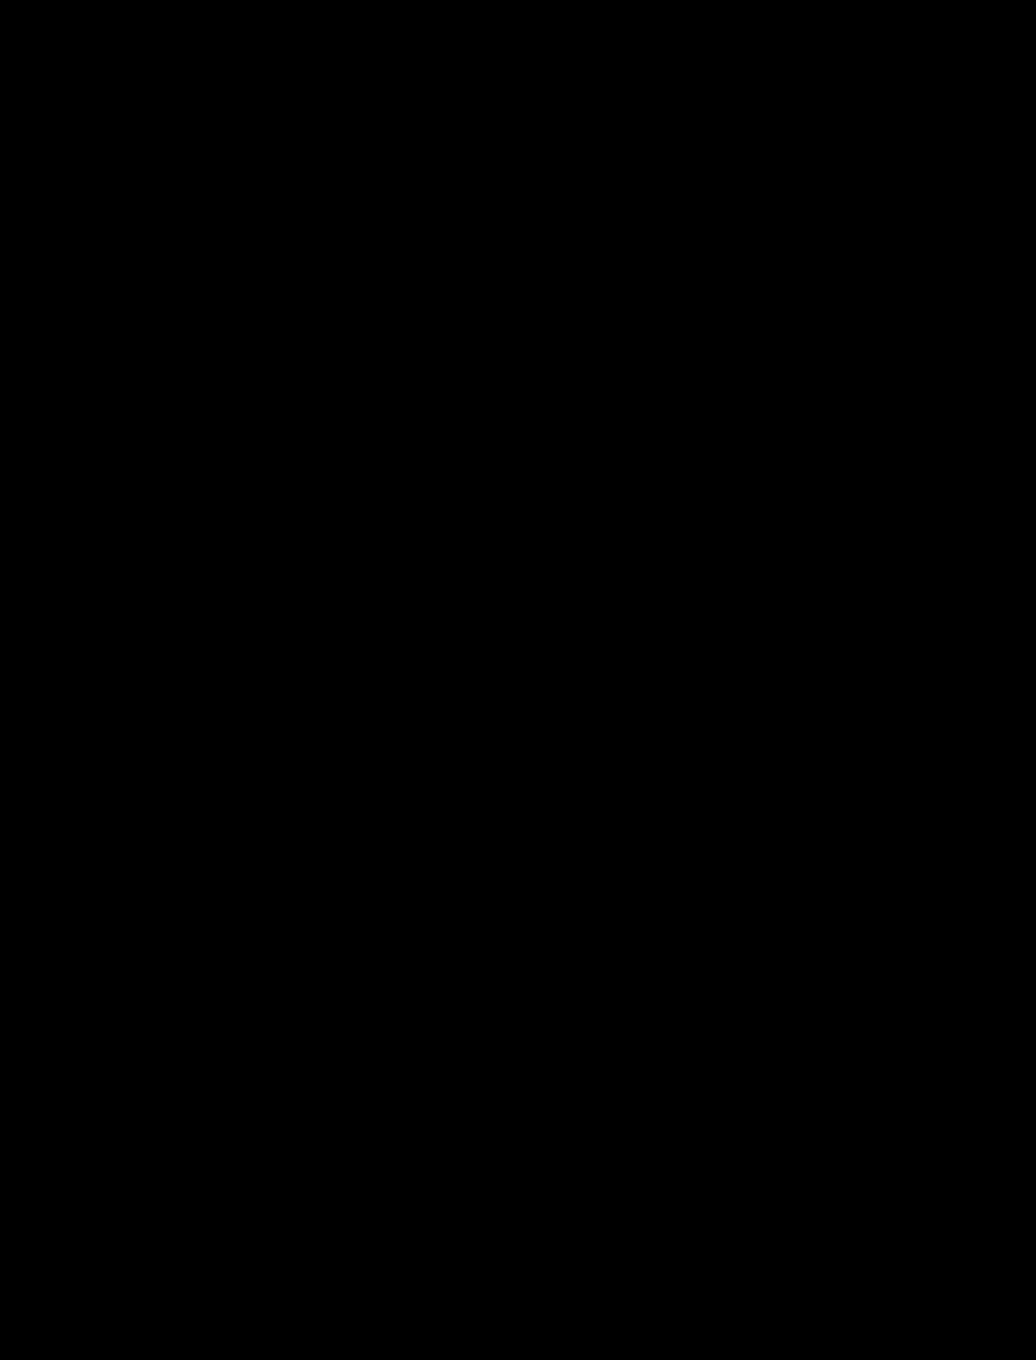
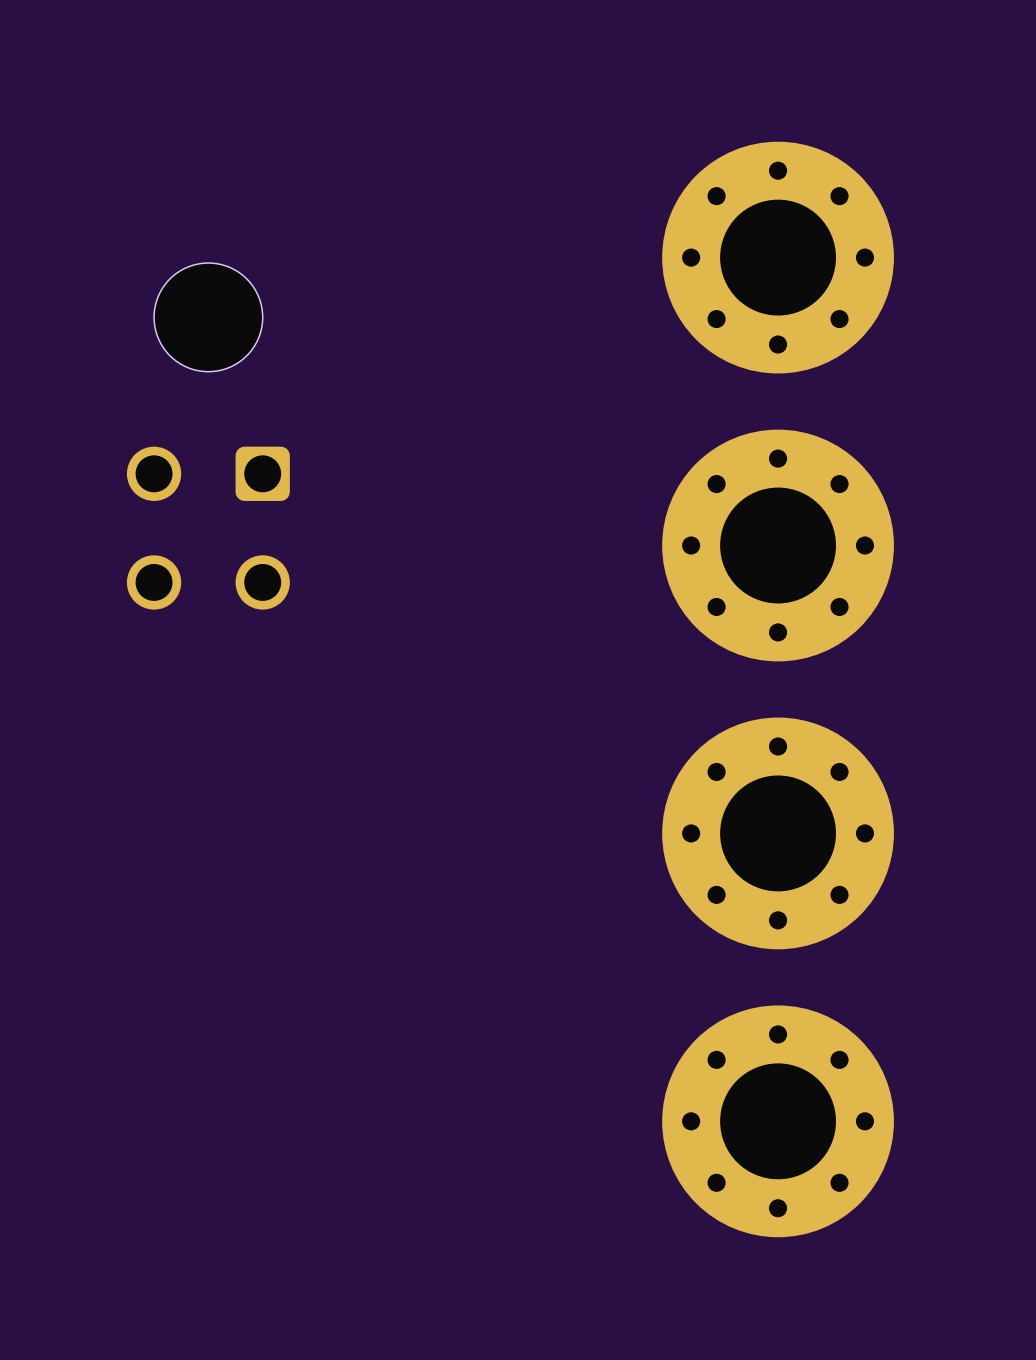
part: none -> (778, 257)
part: none -> (208, 436)
part: none -> (778, 545)
part: none -> (778, 833)
part: none -> (778, 1121)

